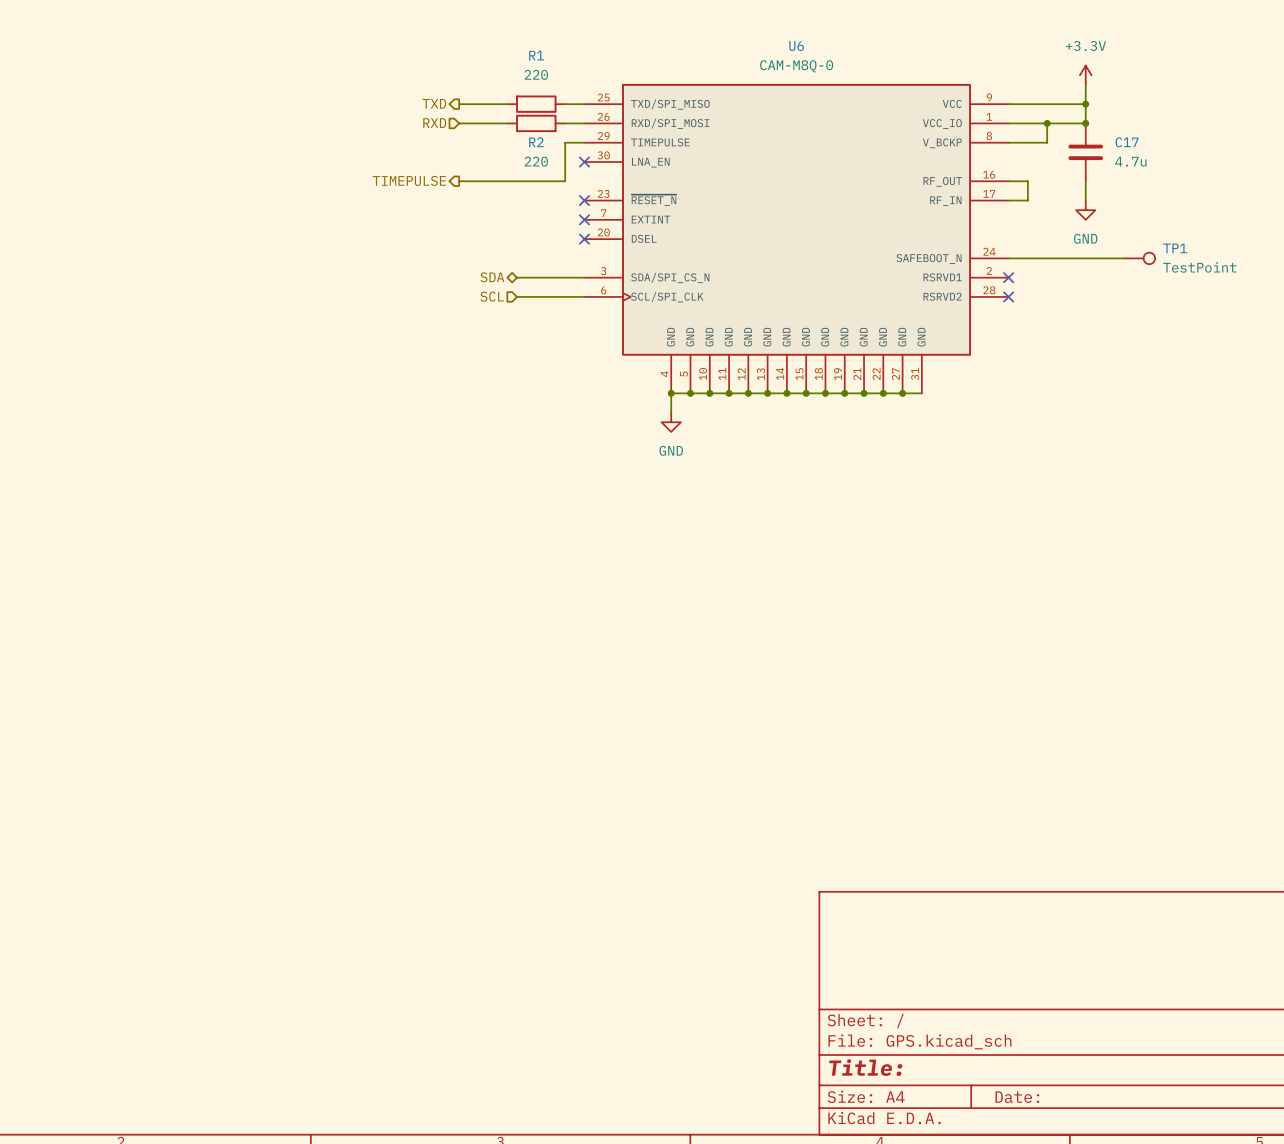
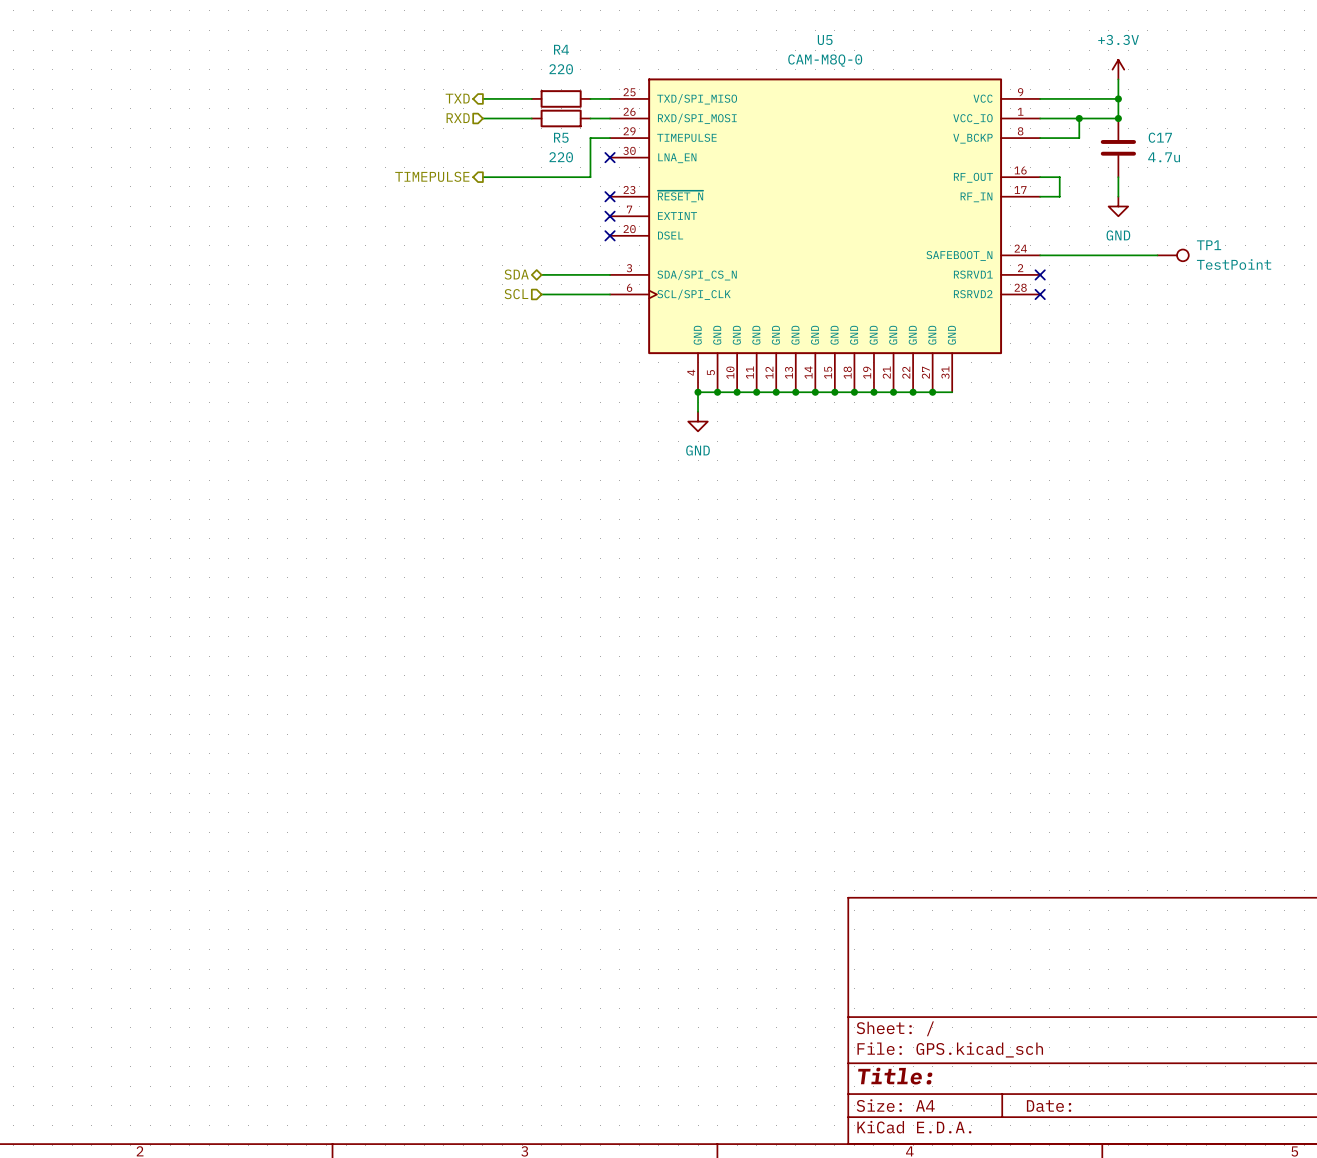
U6 name: U6 (796, 46) -> U5 (825, 40)
R1 name: R1 (536, 55) -> R4 (561, 49)
R2 name: R2 (536, 142) -> R5 (561, 137)

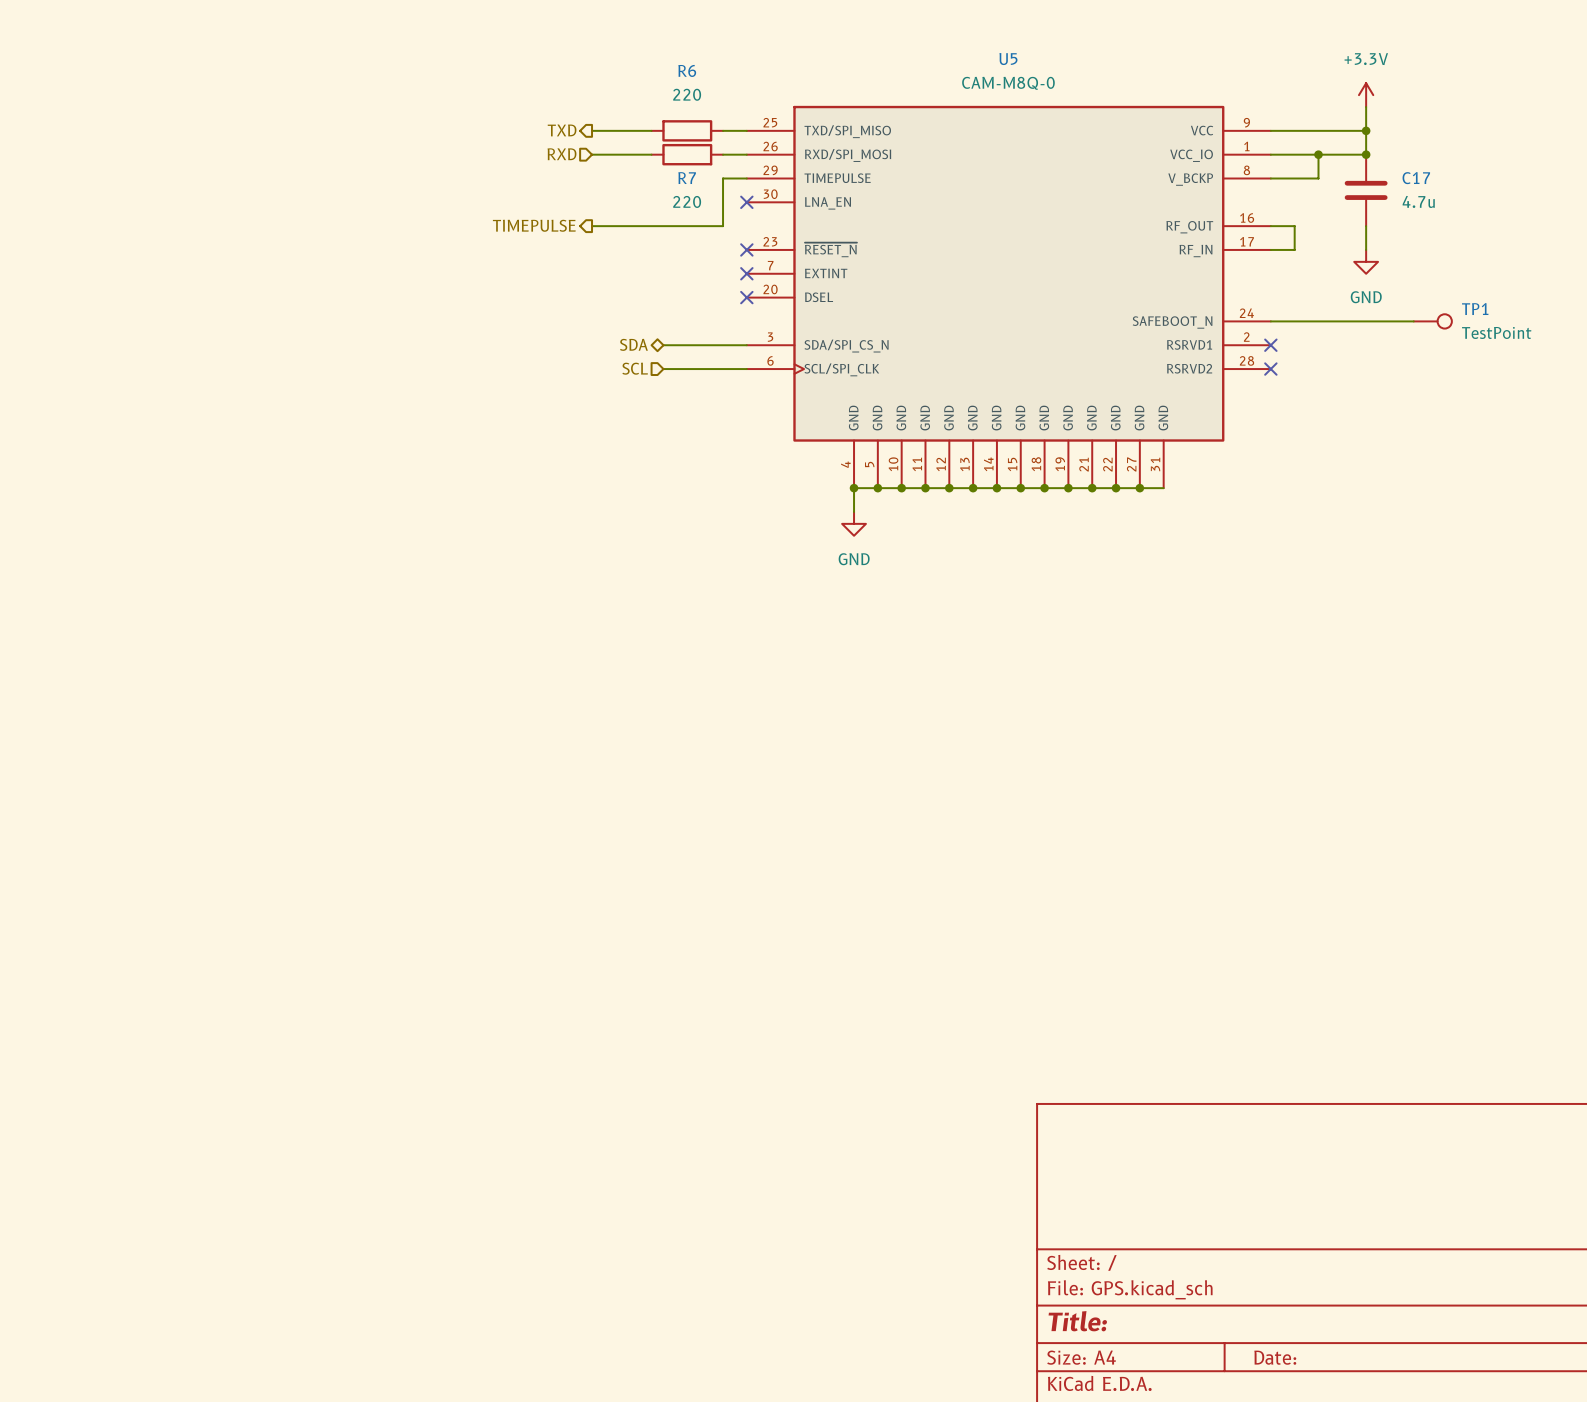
R4 name: R4 (561, 49) -> R6 (687, 70)
R5 name: R5 (561, 137) -> R7 (687, 178)

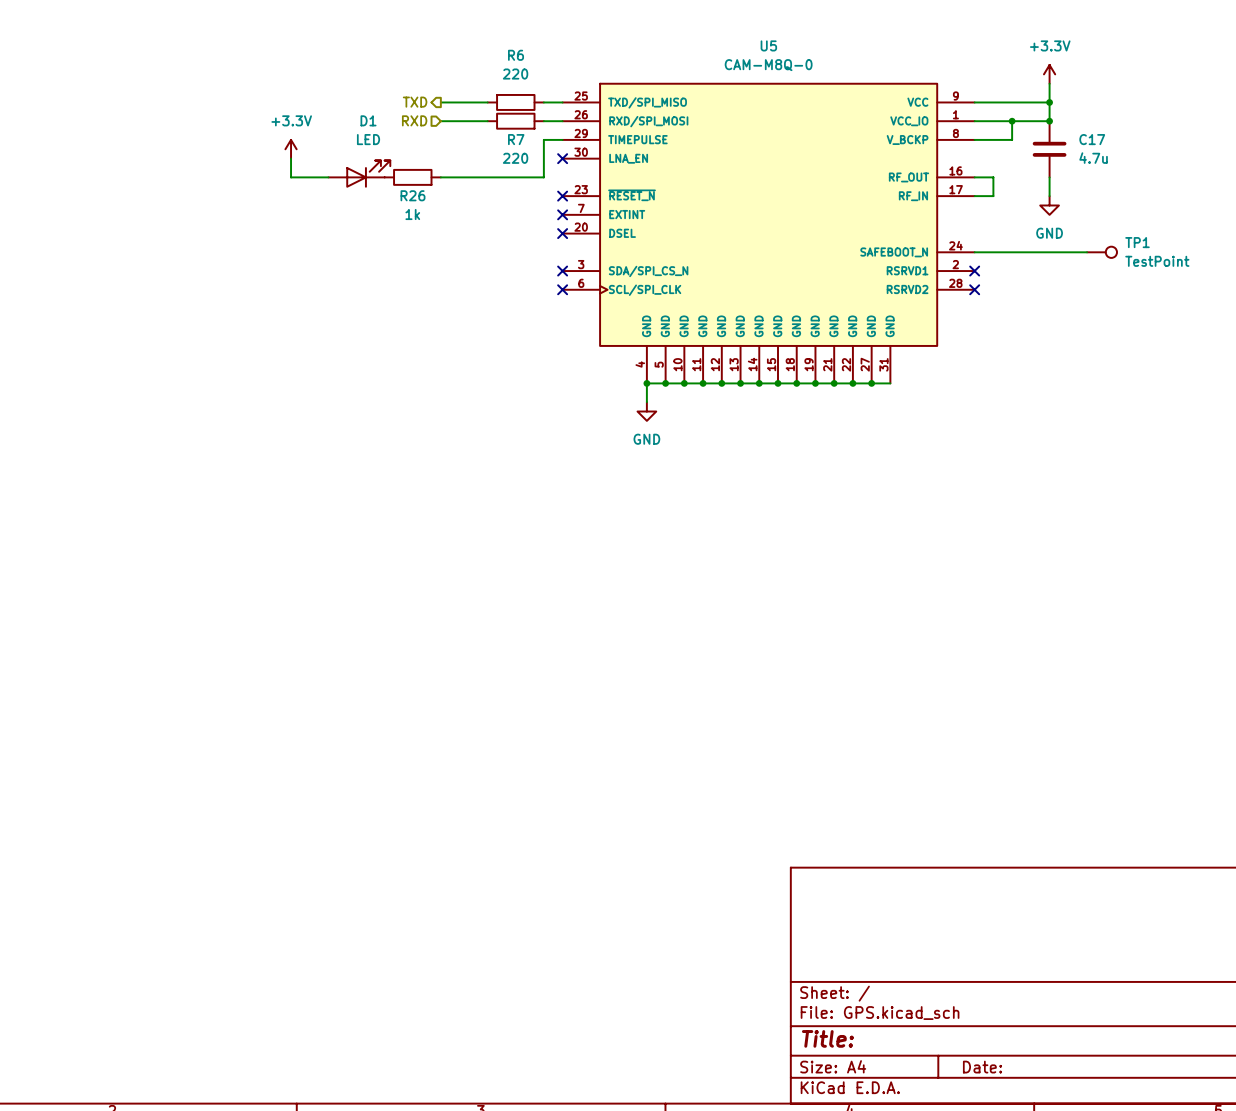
power symbol: none -> +3.3V (291, 149)
wire: none -> (291, 158) (291, 177) (328, 177)
D1: none -> LED (359, 174)
hierarchical label: TIMEPULSE (534, 225) -> none
R26: none -> 1k (412, 177)
hierarchical label: SDA (633, 344) -> none
wire: (663, 345) (746, 345) -> none
no-connect mark: none -> (562, 271)
hierarchical label: SCL (635, 368) -> none
wire: (663, 369) (746, 369) -> none
no-connect mark: none -> (562, 289)

